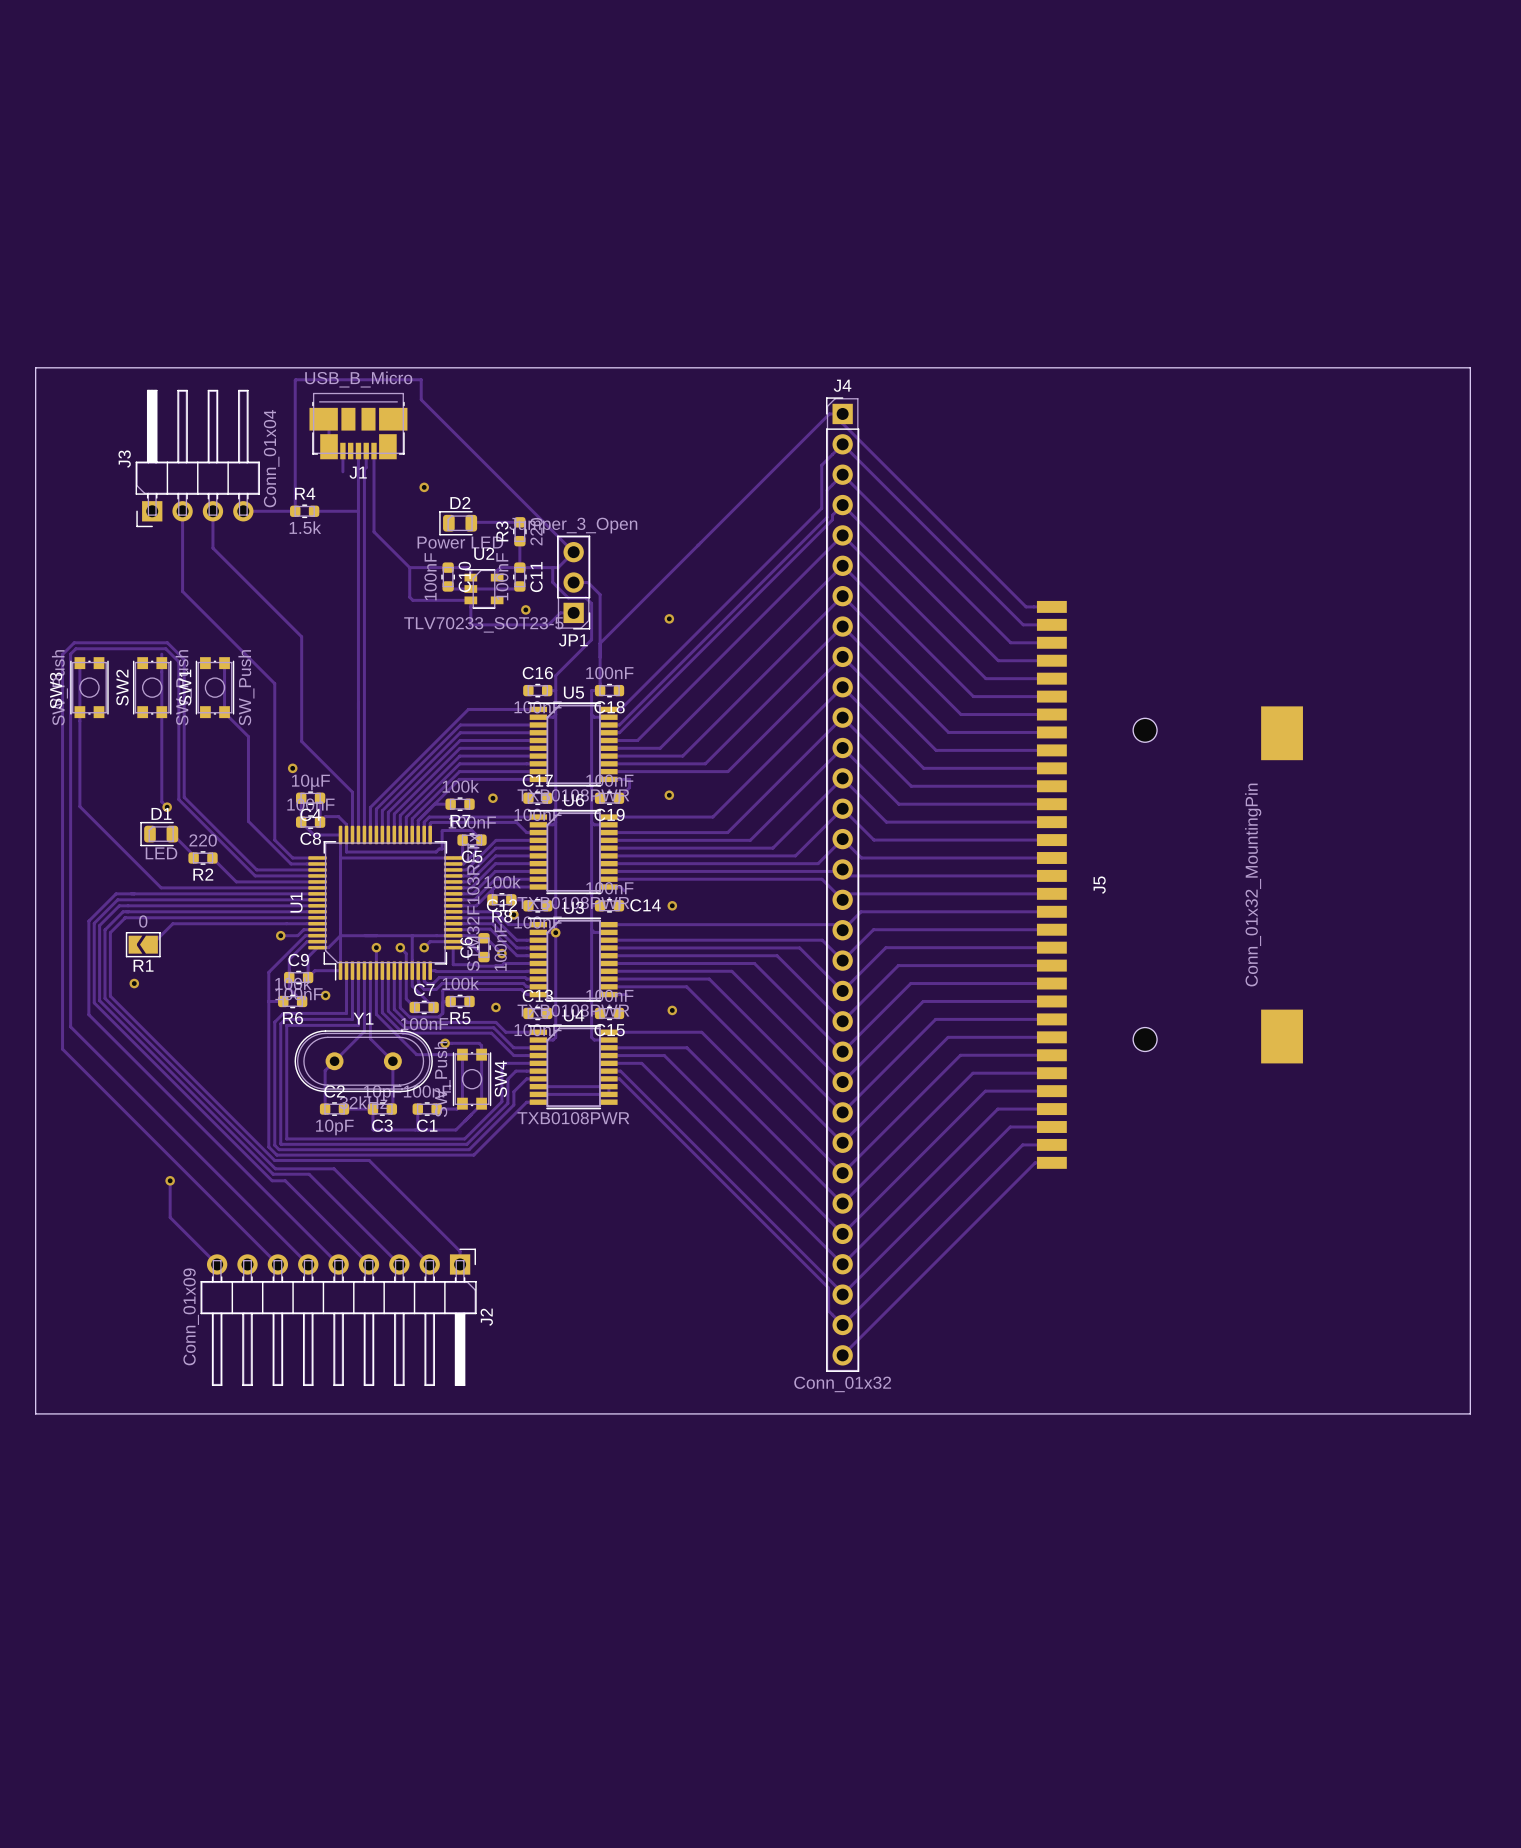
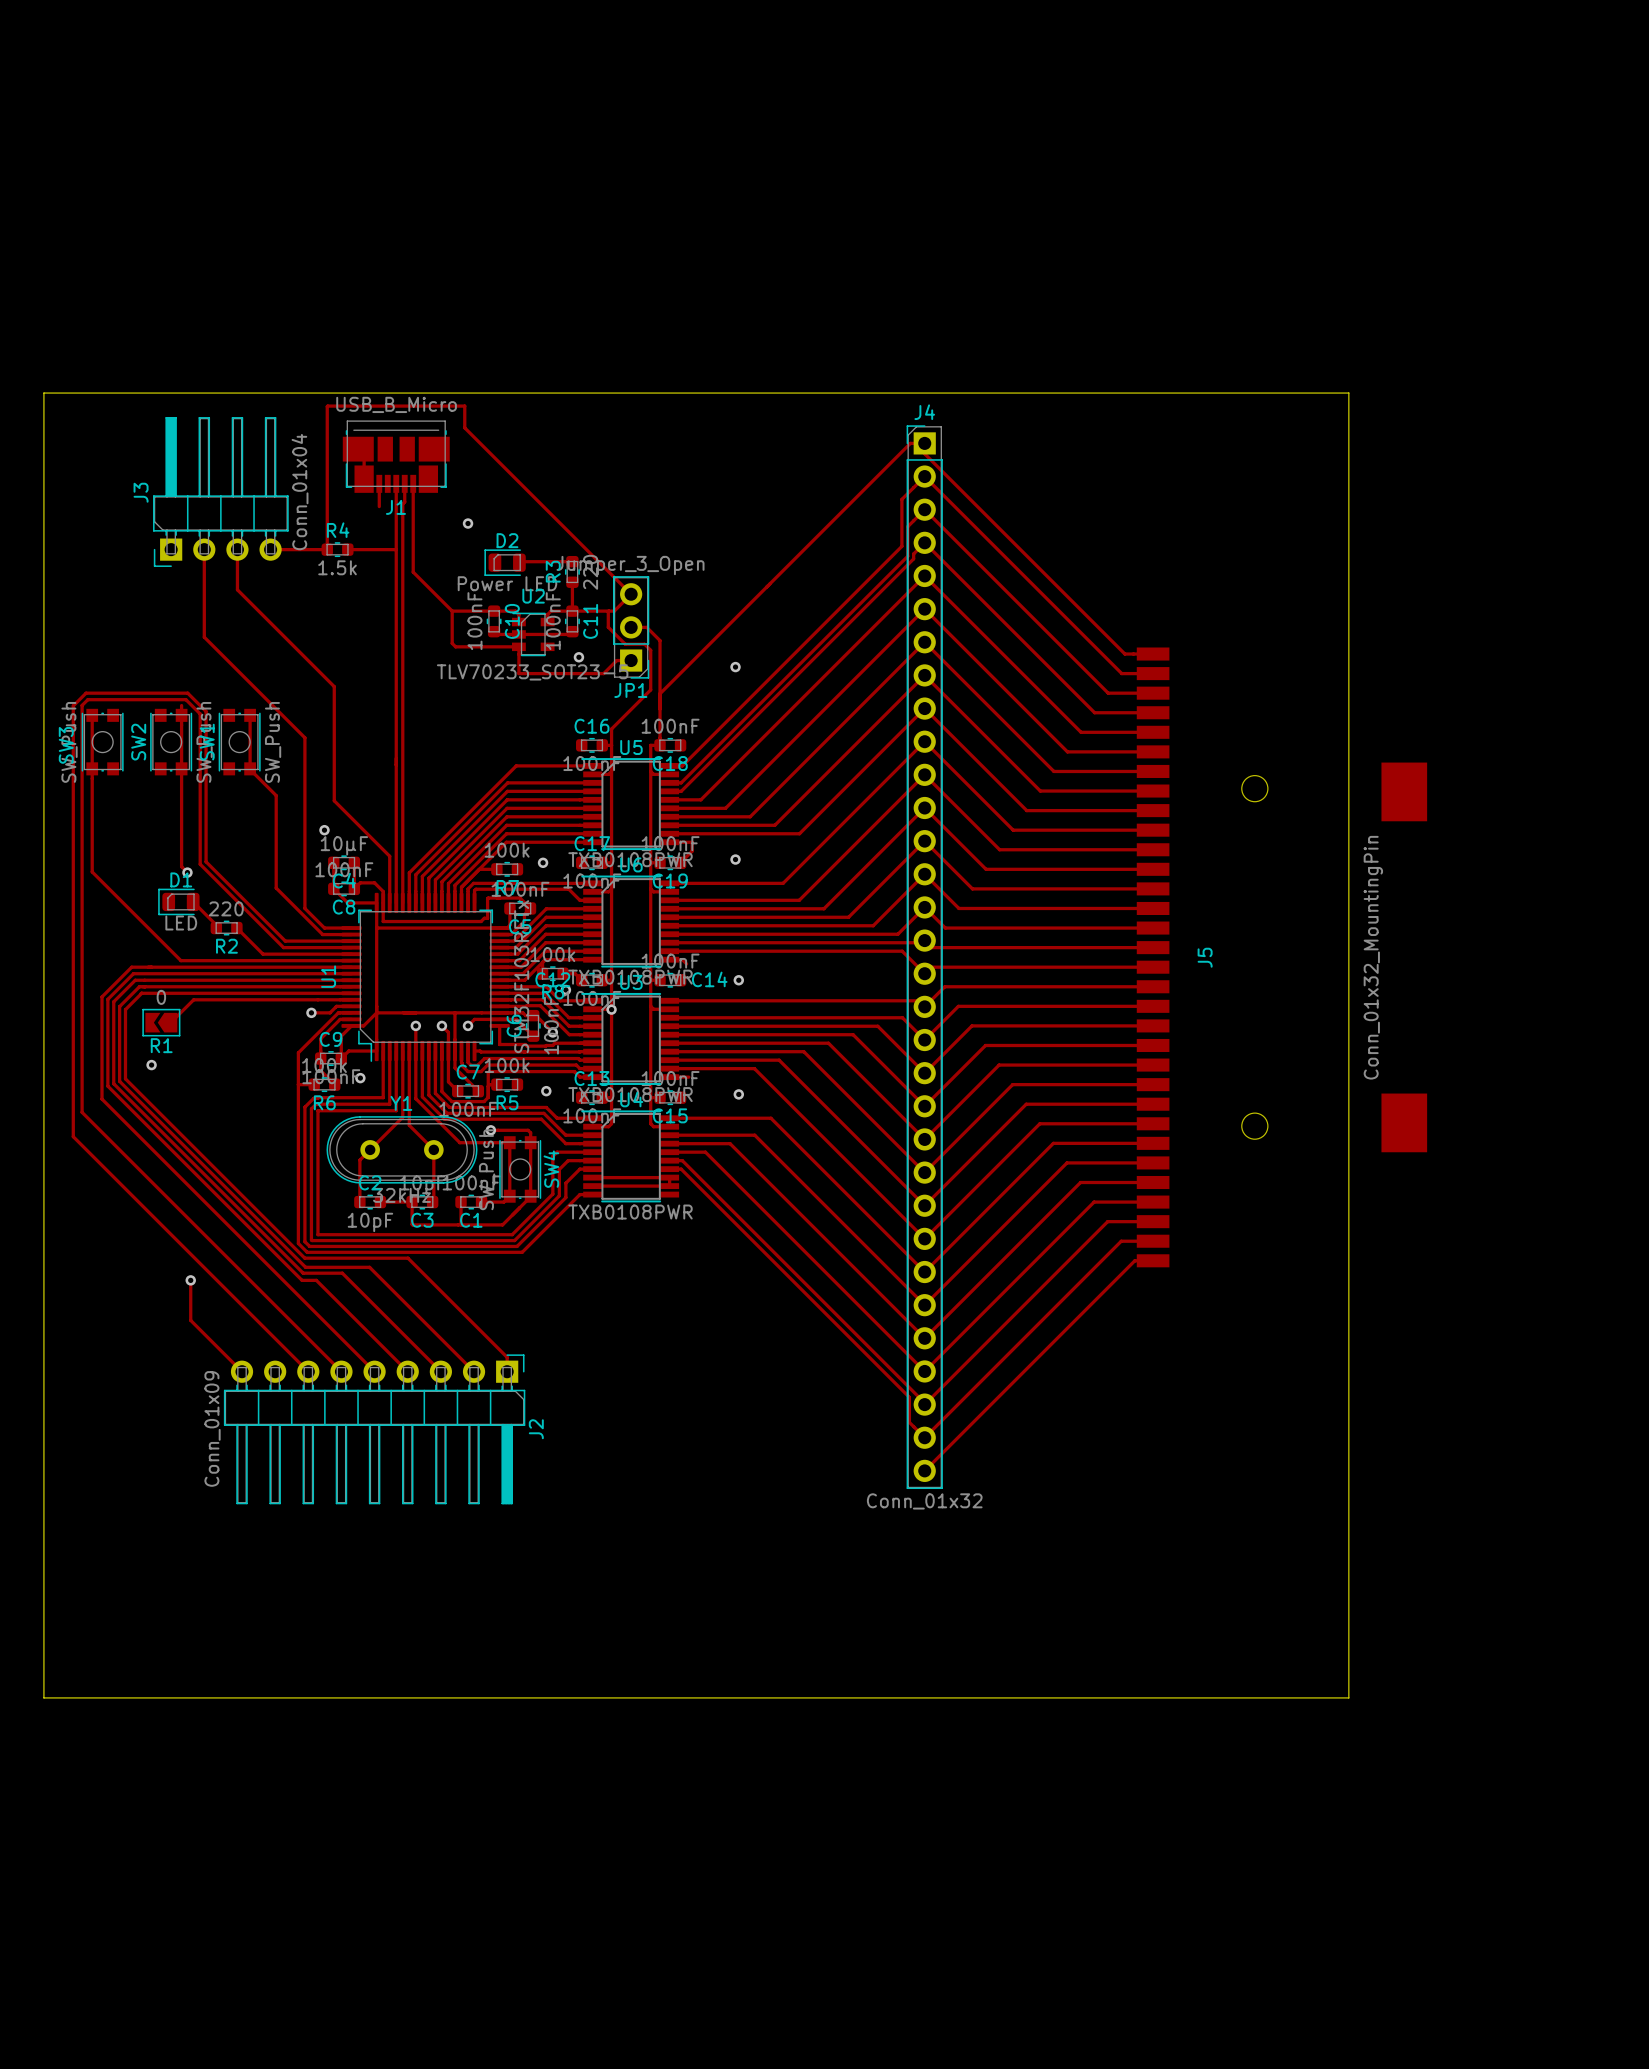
board edge: (1231, 367) (1470, 367) (1470, 1413) (35, 1413) -> (1348, 393) (1348, 1697) (43, 1697) (43, 1534)

